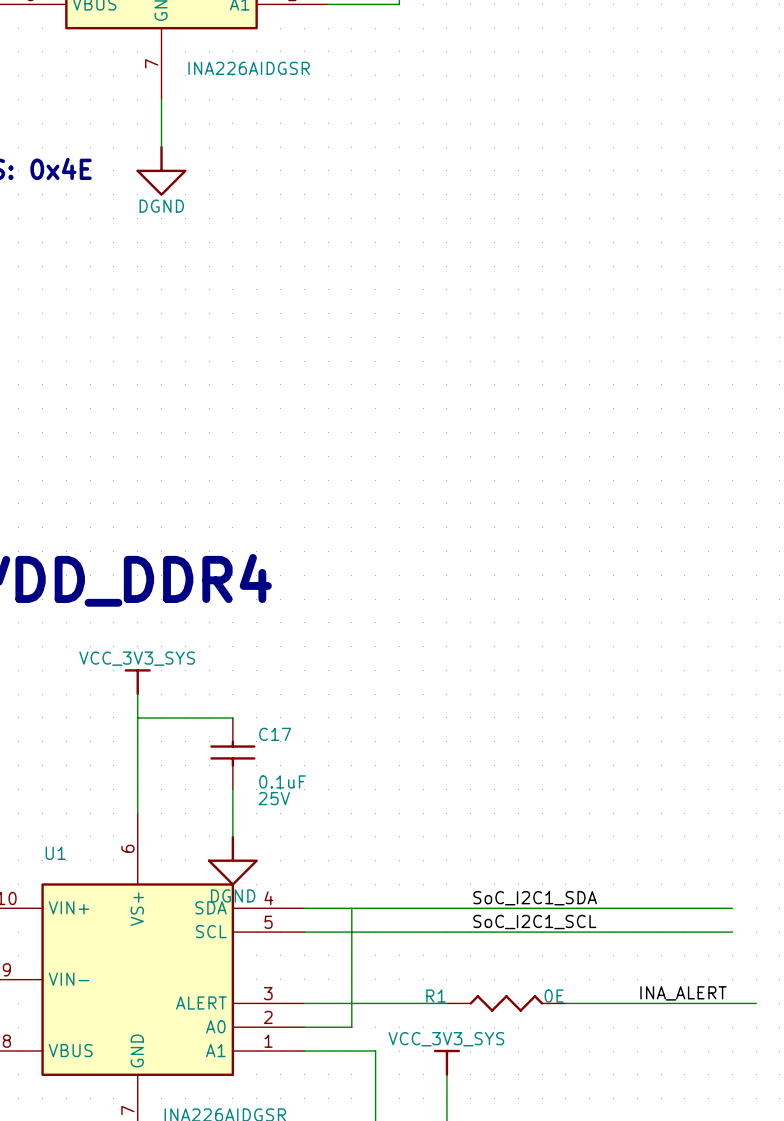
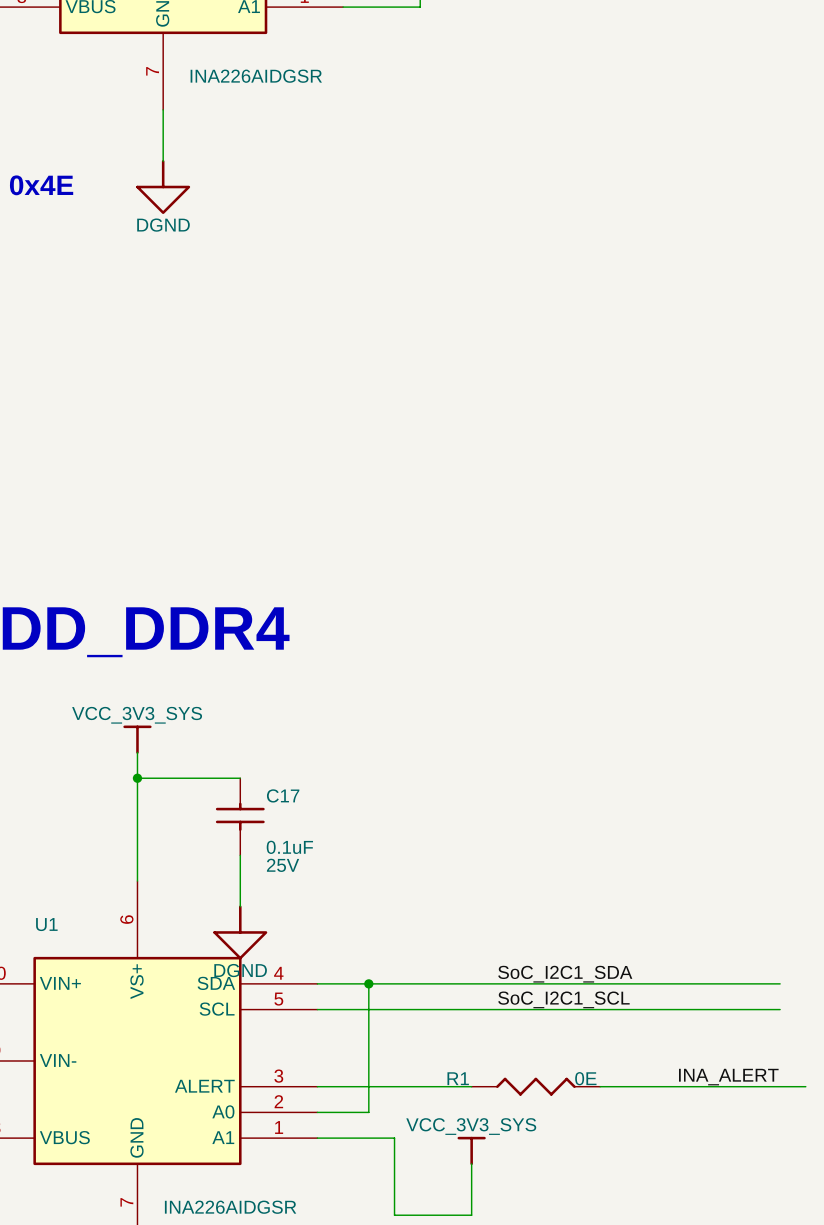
junction: none -> (137, 778)
junction: none -> (368, 983)

